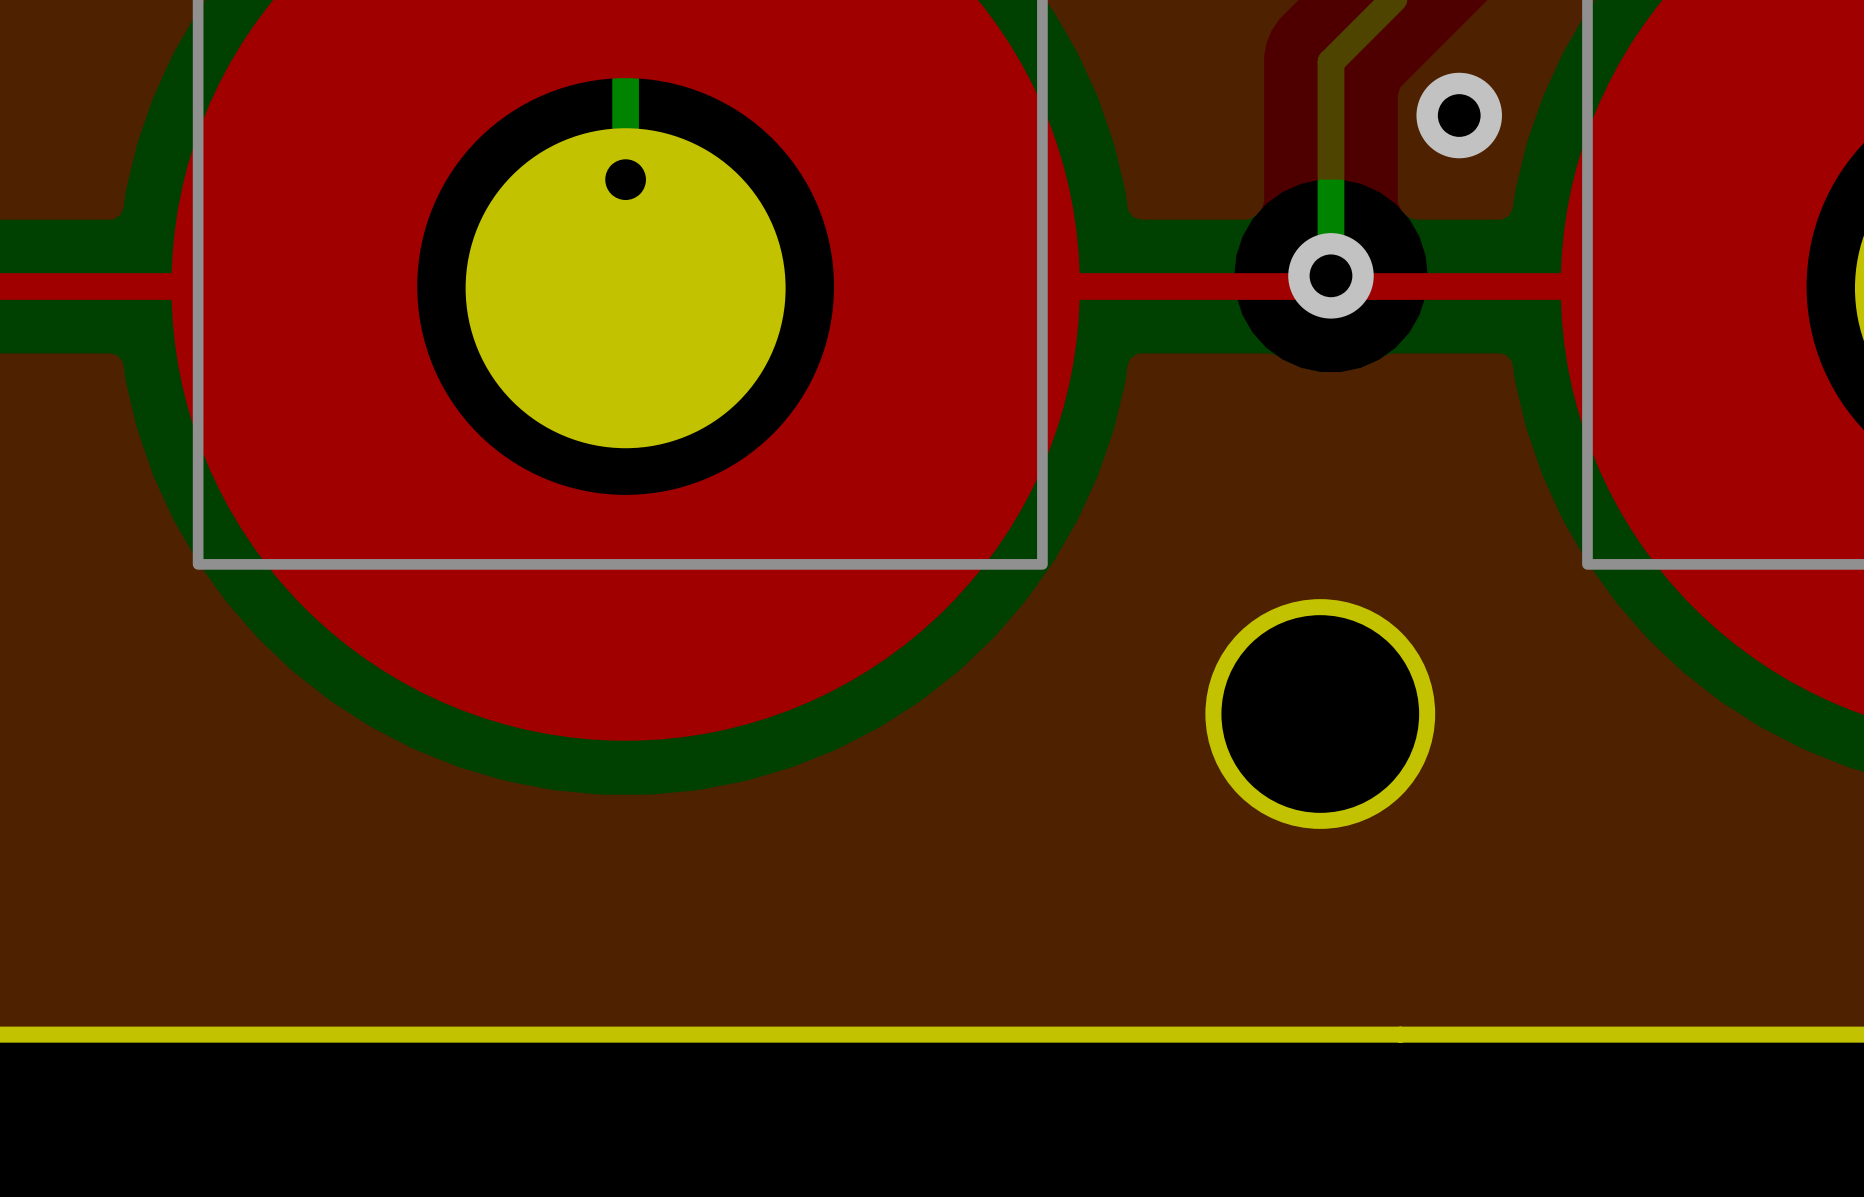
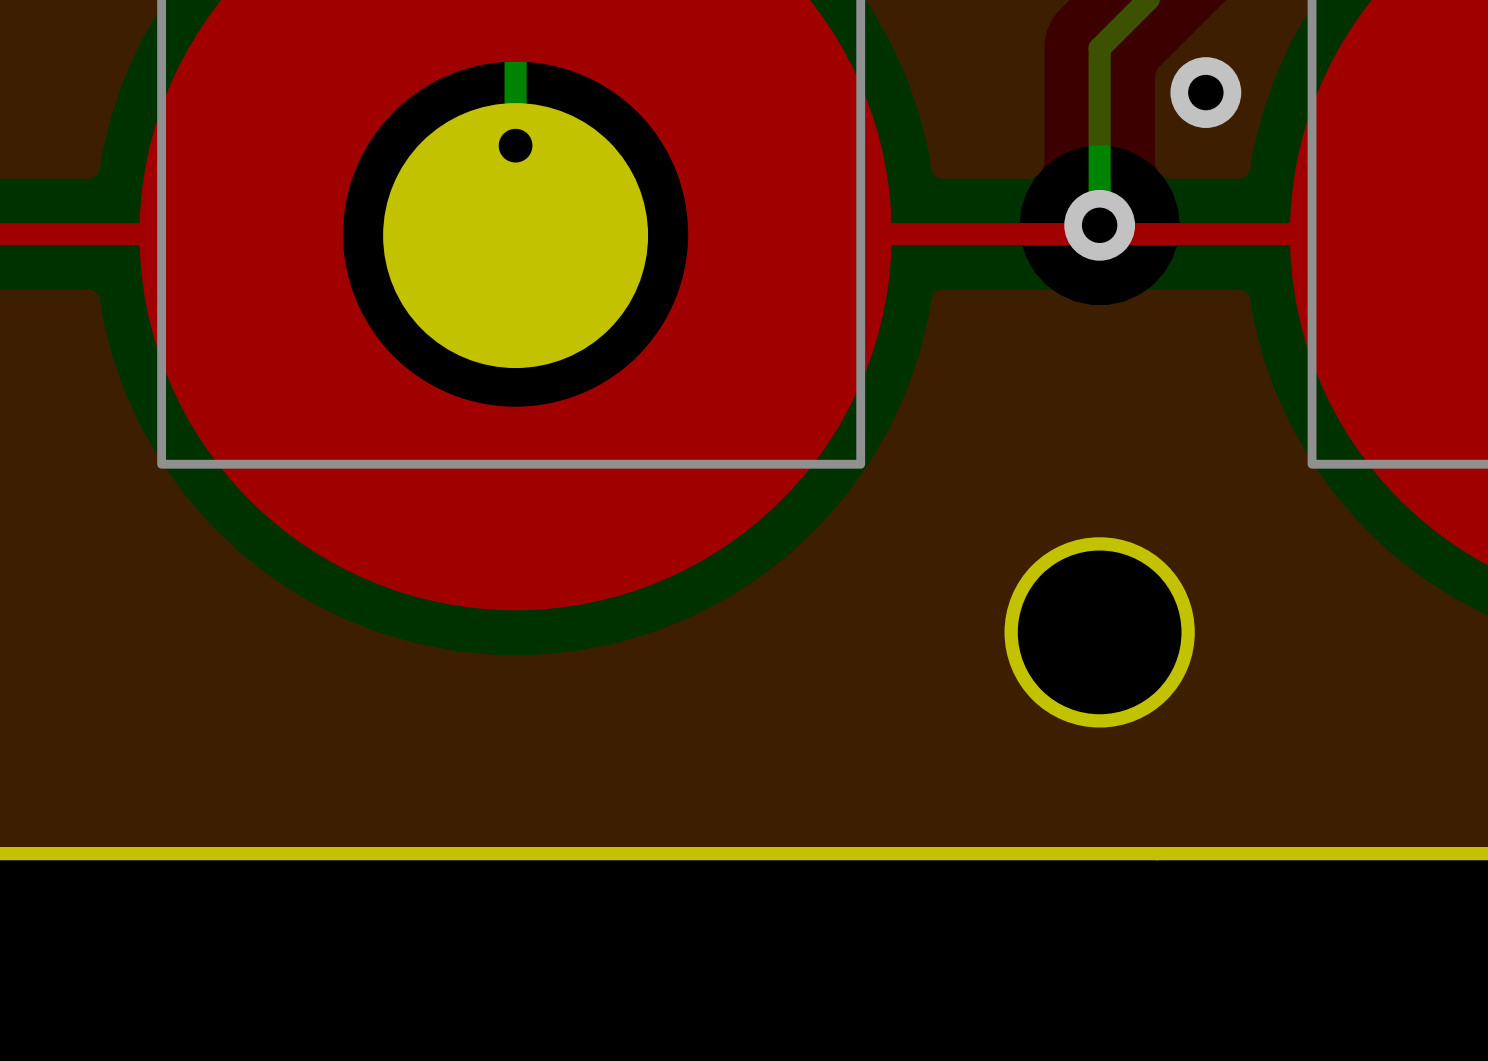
round board edge position: (1320, 714) -> (1099, 632)

